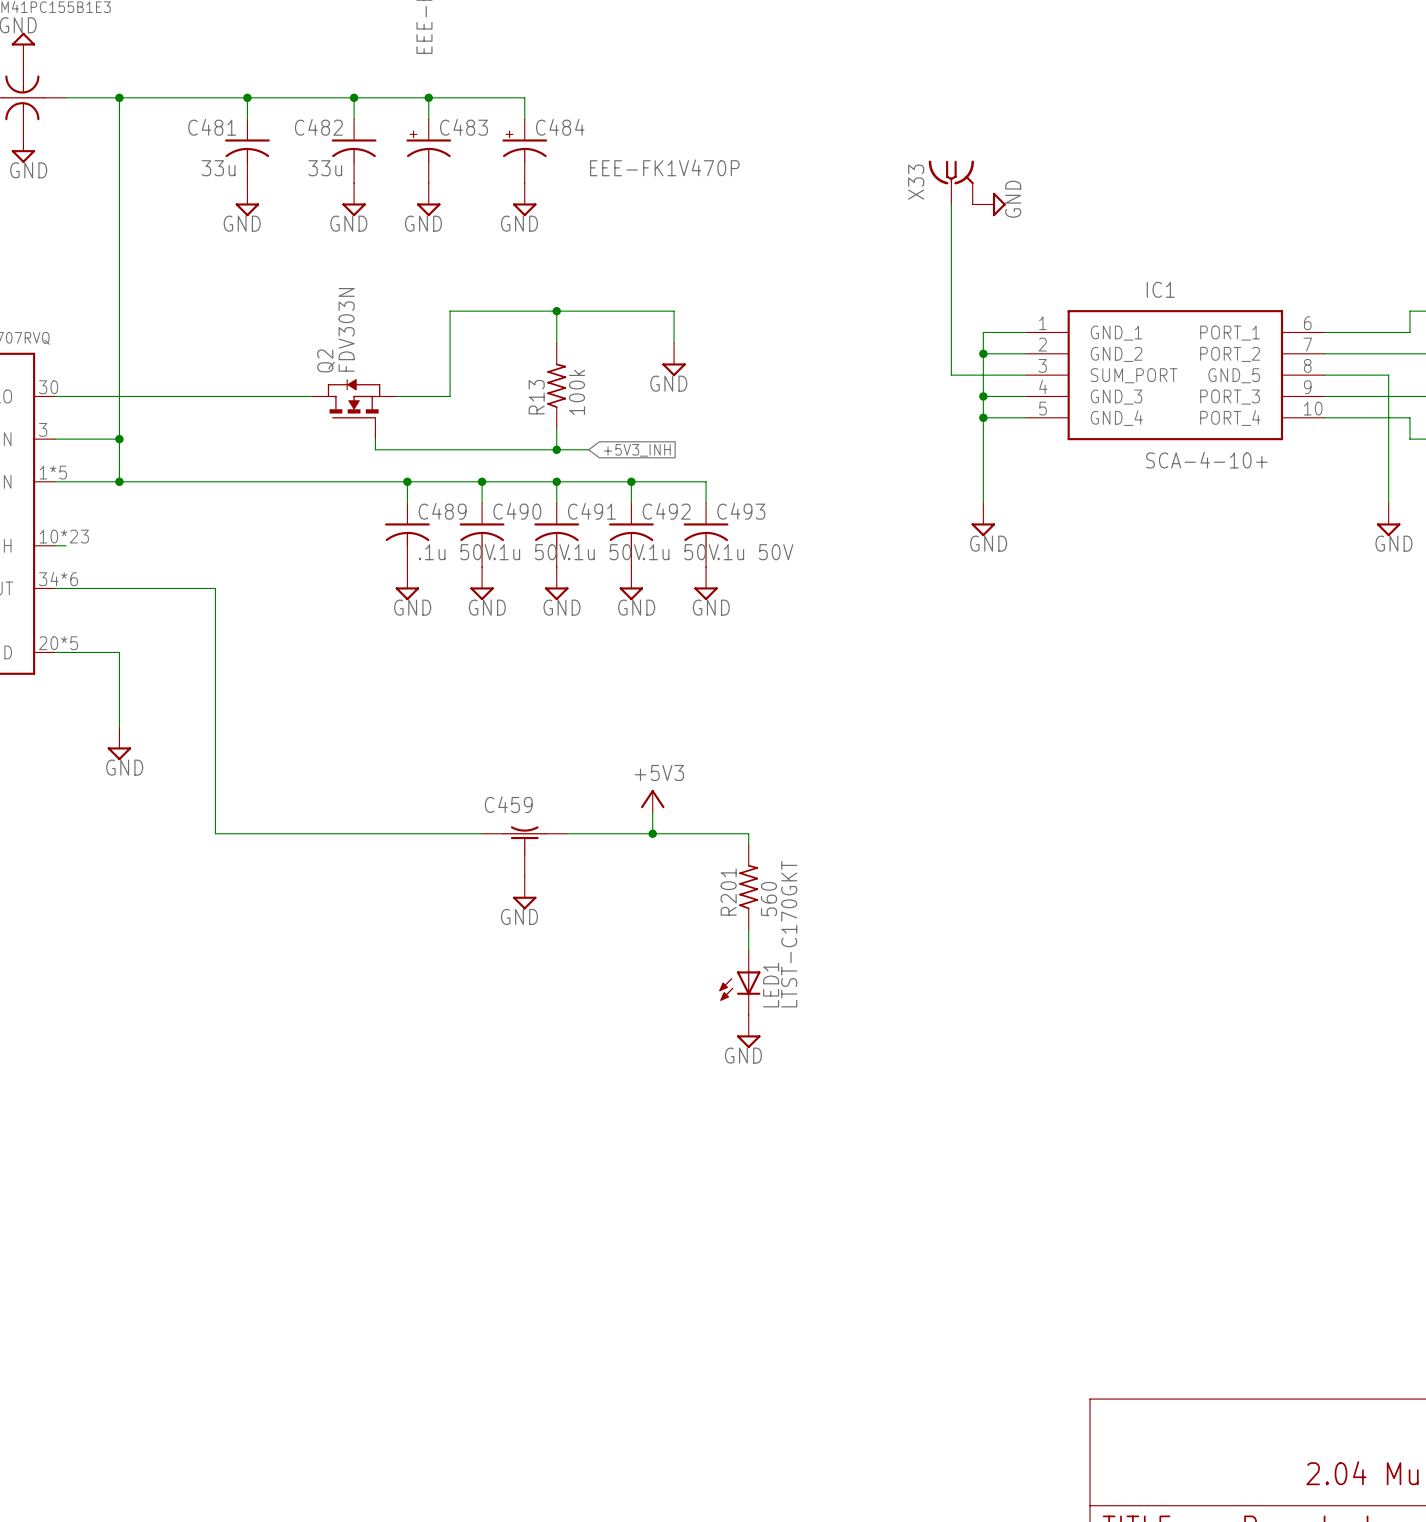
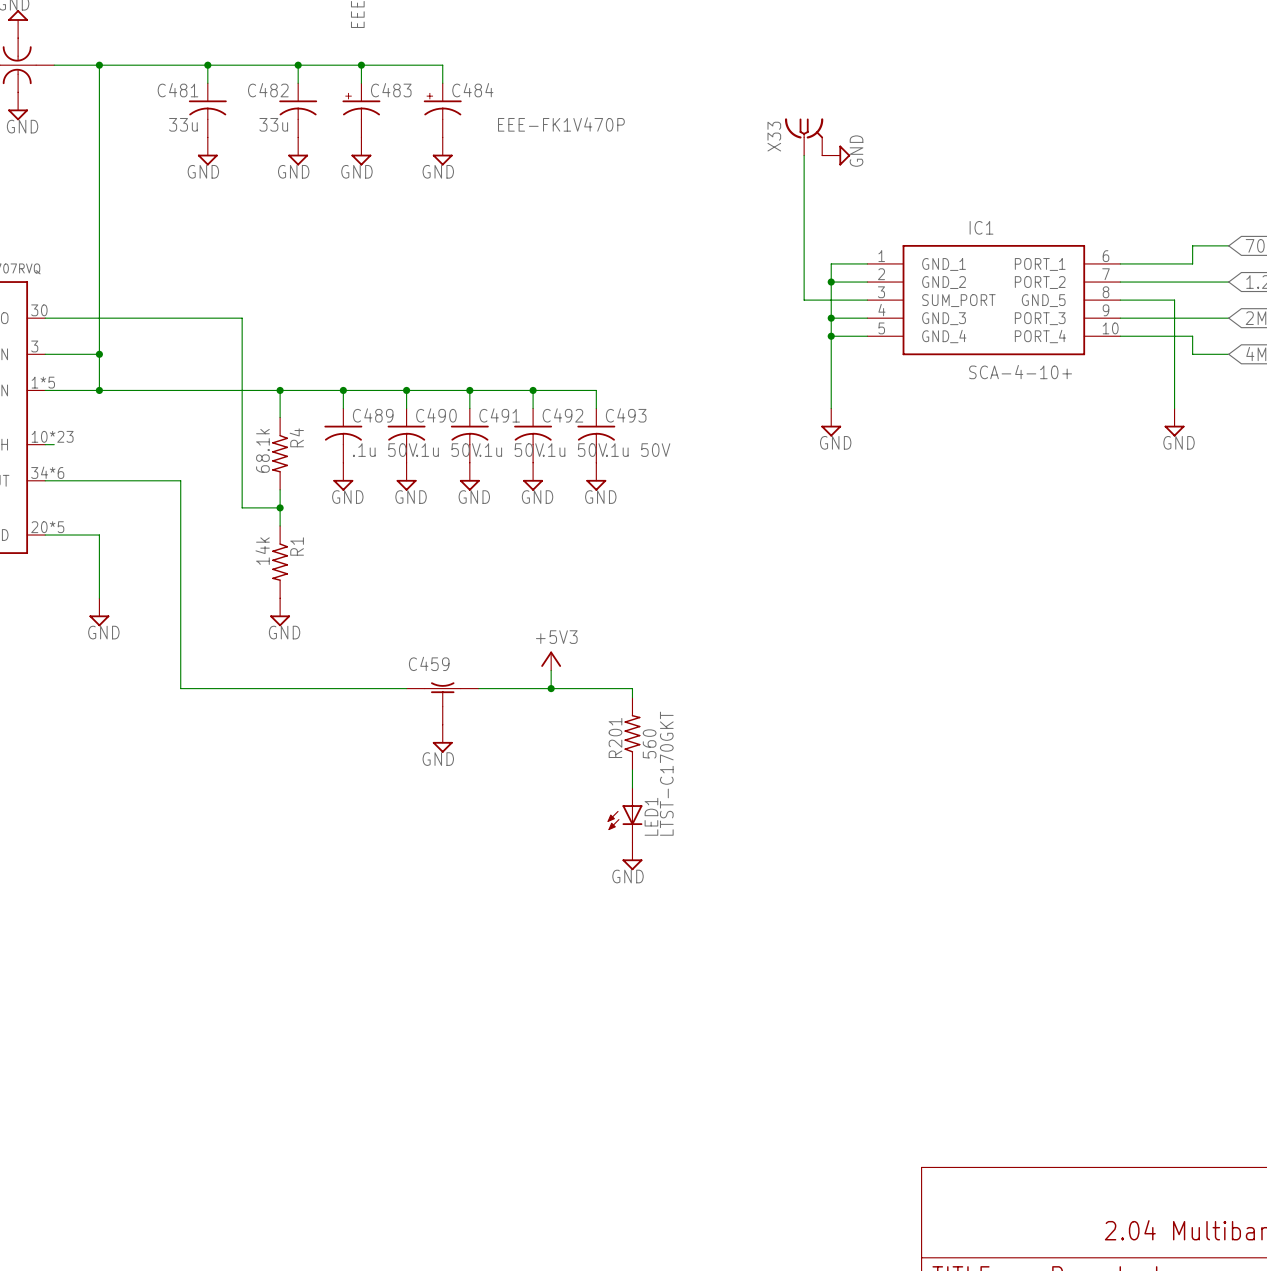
wire: (556, 311) (556, 343) -> none
junction: (556, 311) -> none
wire: (674, 343) (674, 311) (450, 311) (450, 396) (396, 396) -> none
power symbol: GND (674, 359) -> none
R13: 100k (556, 385) -> none
wire: (287, 396) (311, 396) -> (242, 318) (242, 507) (280, 507)
Q2: FDV303N (354, 409) -> none
wire: (556, 428) (556, 449) -> none
wire: (375, 439) (375, 449) (588, 449) -> none
junction: (556, 449) -> none
global label: +5V3_INH (637, 450) -> none
wire: none -> (280, 390) (280, 417)
junction: none -> (280, 390)
R4: none -> 68.1k (280, 453)
wire: none -> (280, 489) (280, 525)
junction: none -> (280, 507)
R1: none -> 14k (280, 562)
power symbol: none -> GND (280, 612)

